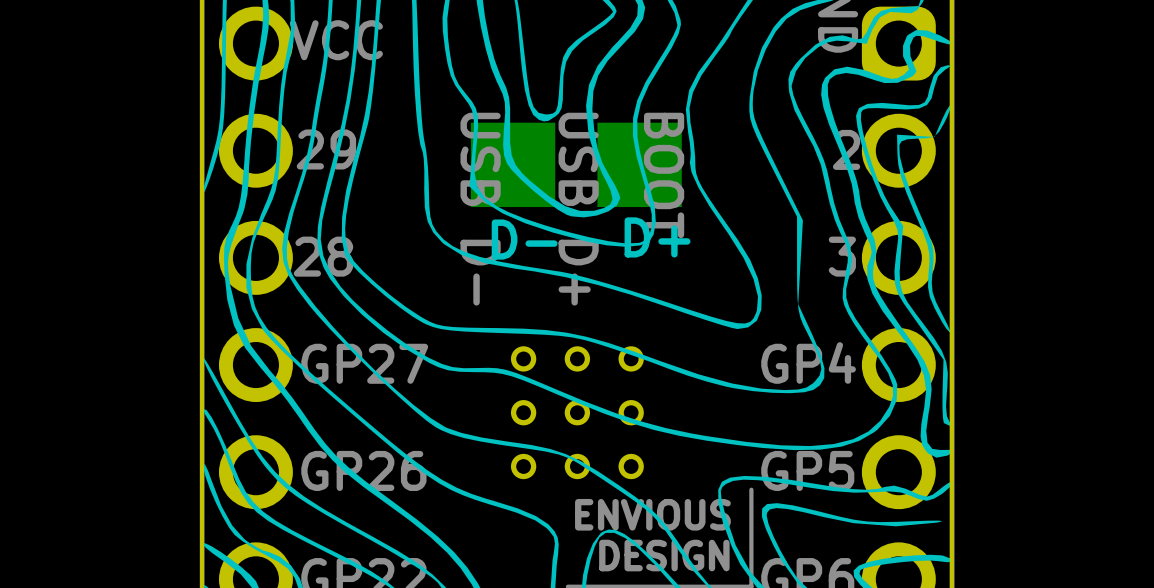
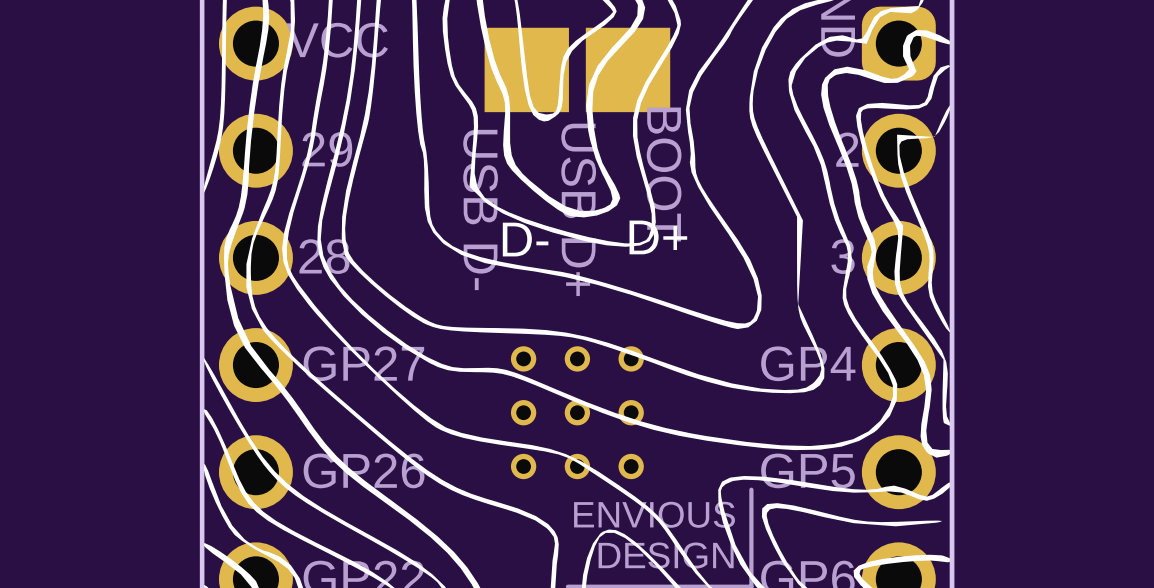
part: none -> (526, 69)
part: none -> (628, 69)
part: (513, 164) -> none
part: (639, 164) -> none

